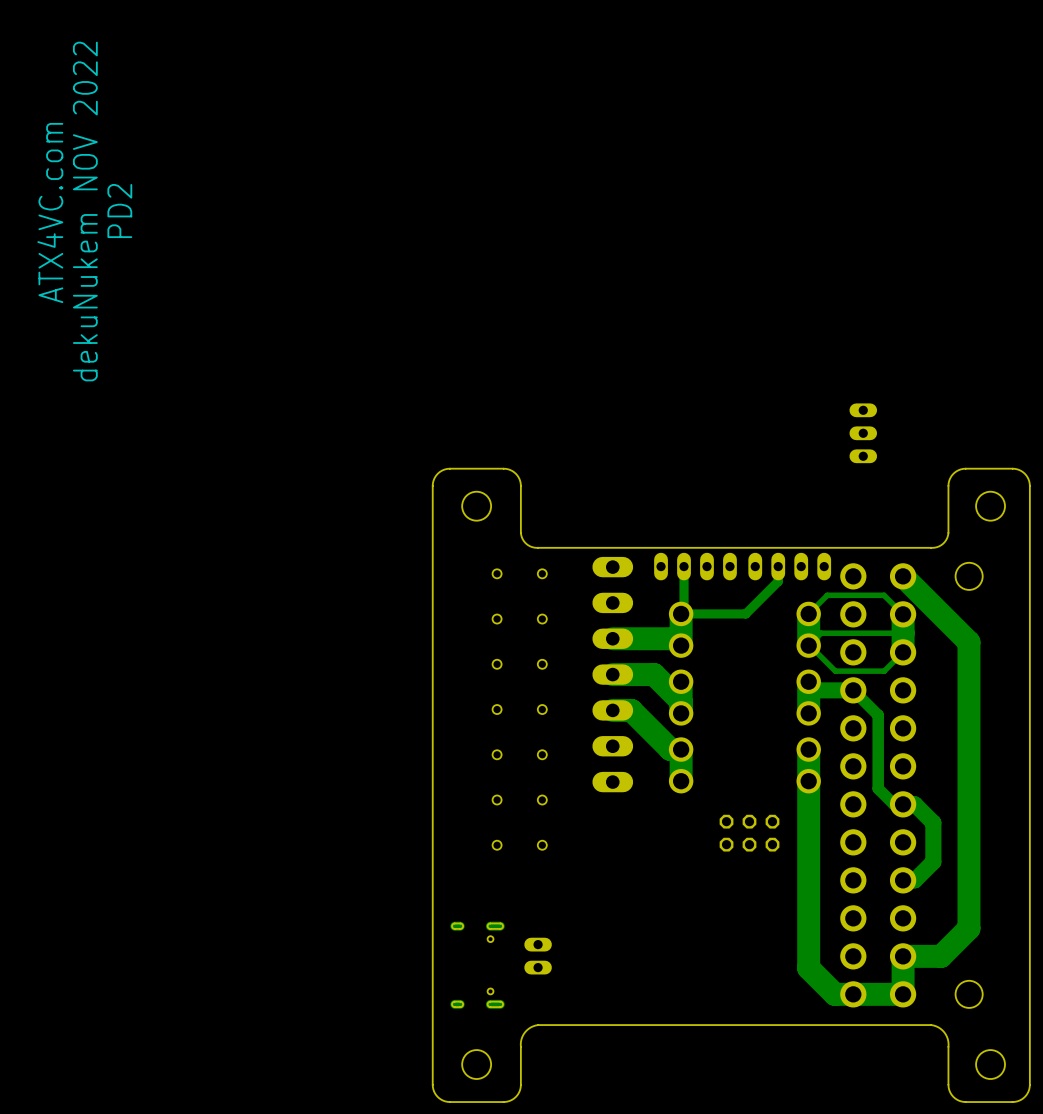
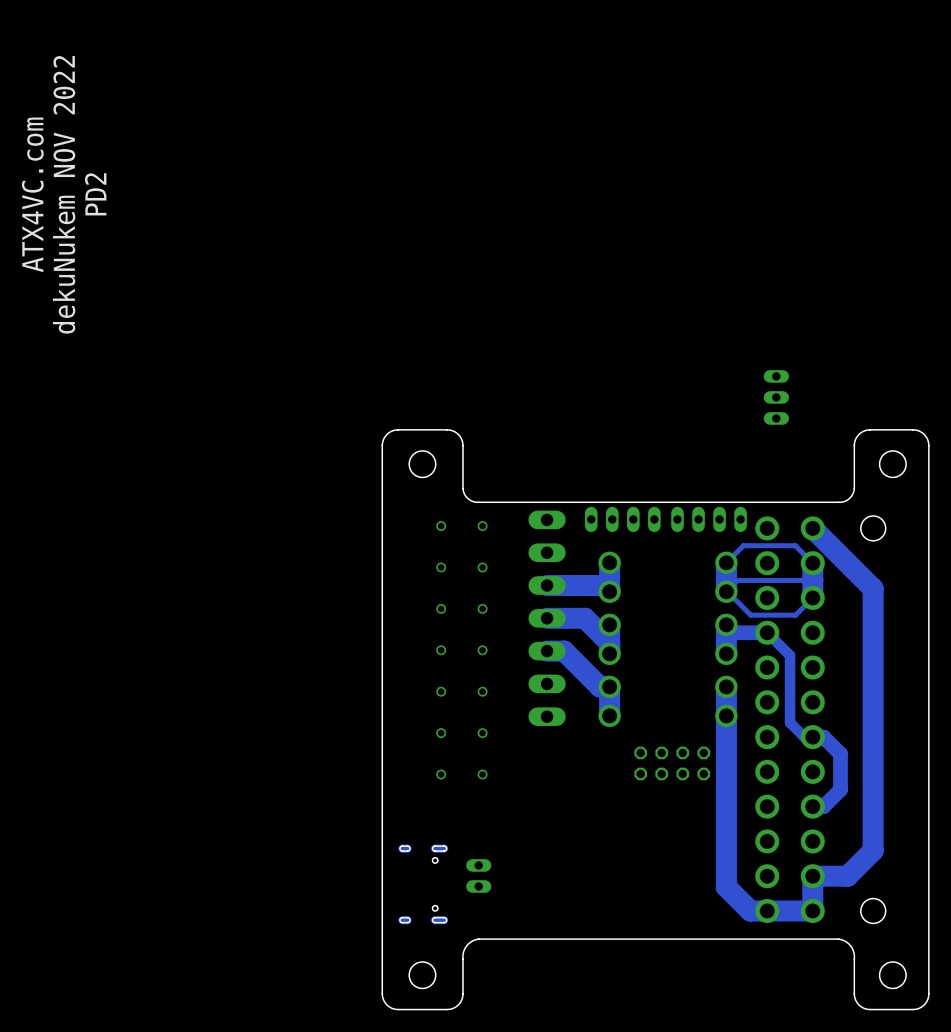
track: (684, 566) (684, 611) -> none
track: (778, 566) (778, 581) (745, 613) (681, 613) -> none
part footprint: [719, 814, 780, 852] -> [634, 746, 711, 781]

